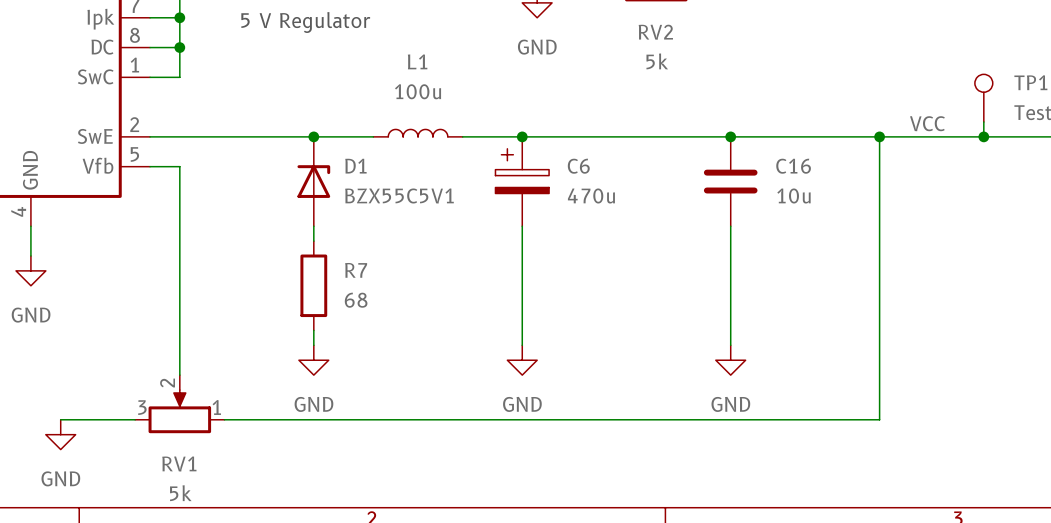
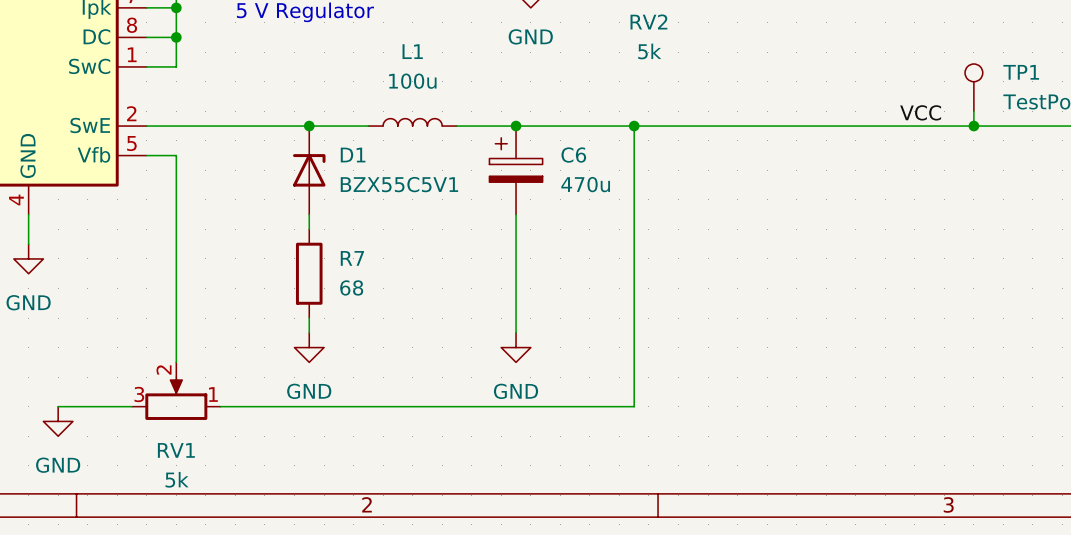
junction: none -> (634, 126)
junction: (730, 136) -> none
wire: (879, 136) (879, 419) (641, 419) -> (634, 126) (634, 406)
junction: (879, 136) -> none
C16: 10u (730, 181) -> none
wire: (730, 226) (730, 345) -> none
power symbol: GND (730, 360) -> none

